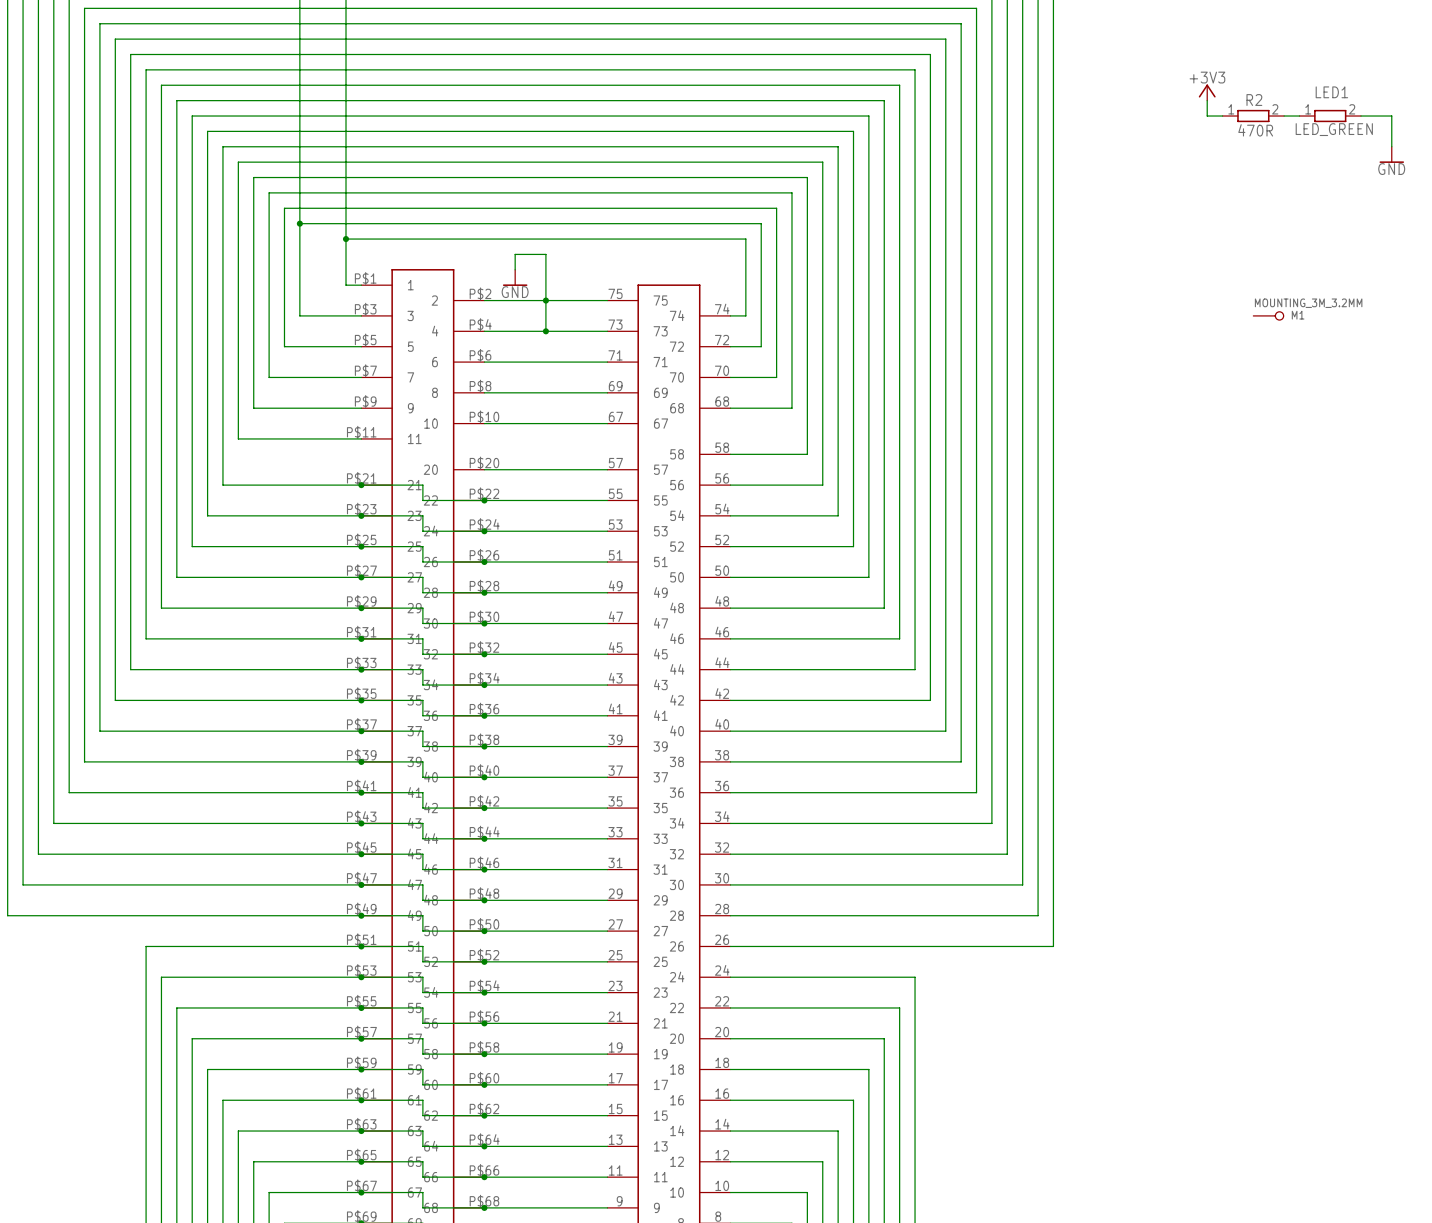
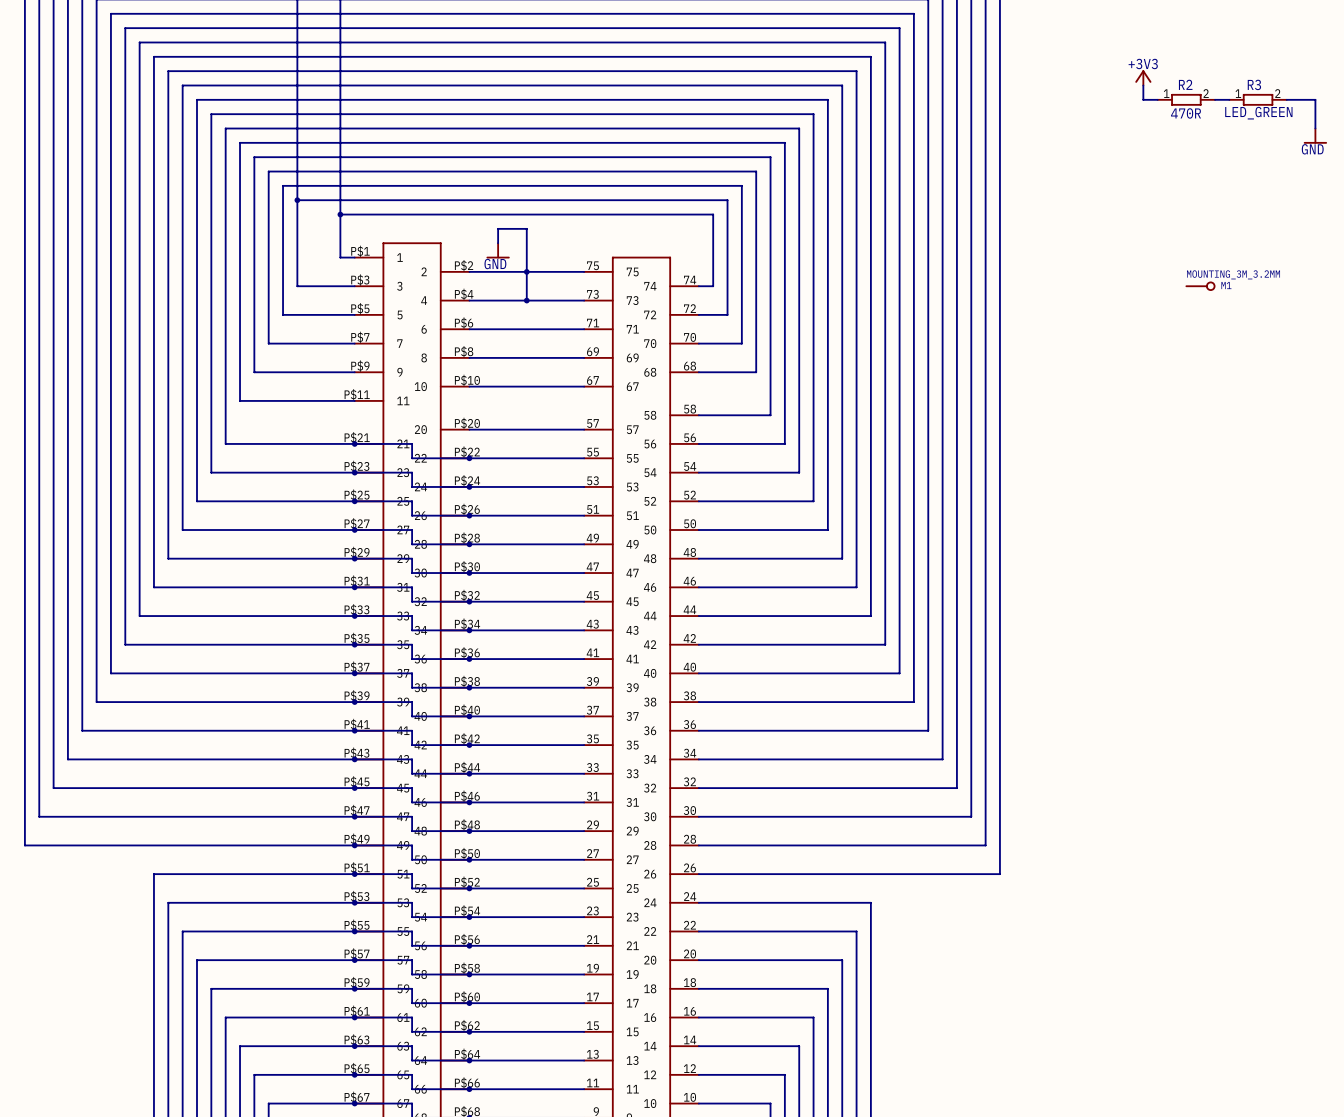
LED1 name: LED1 (1331, 92) -> R3 (1254, 84)

